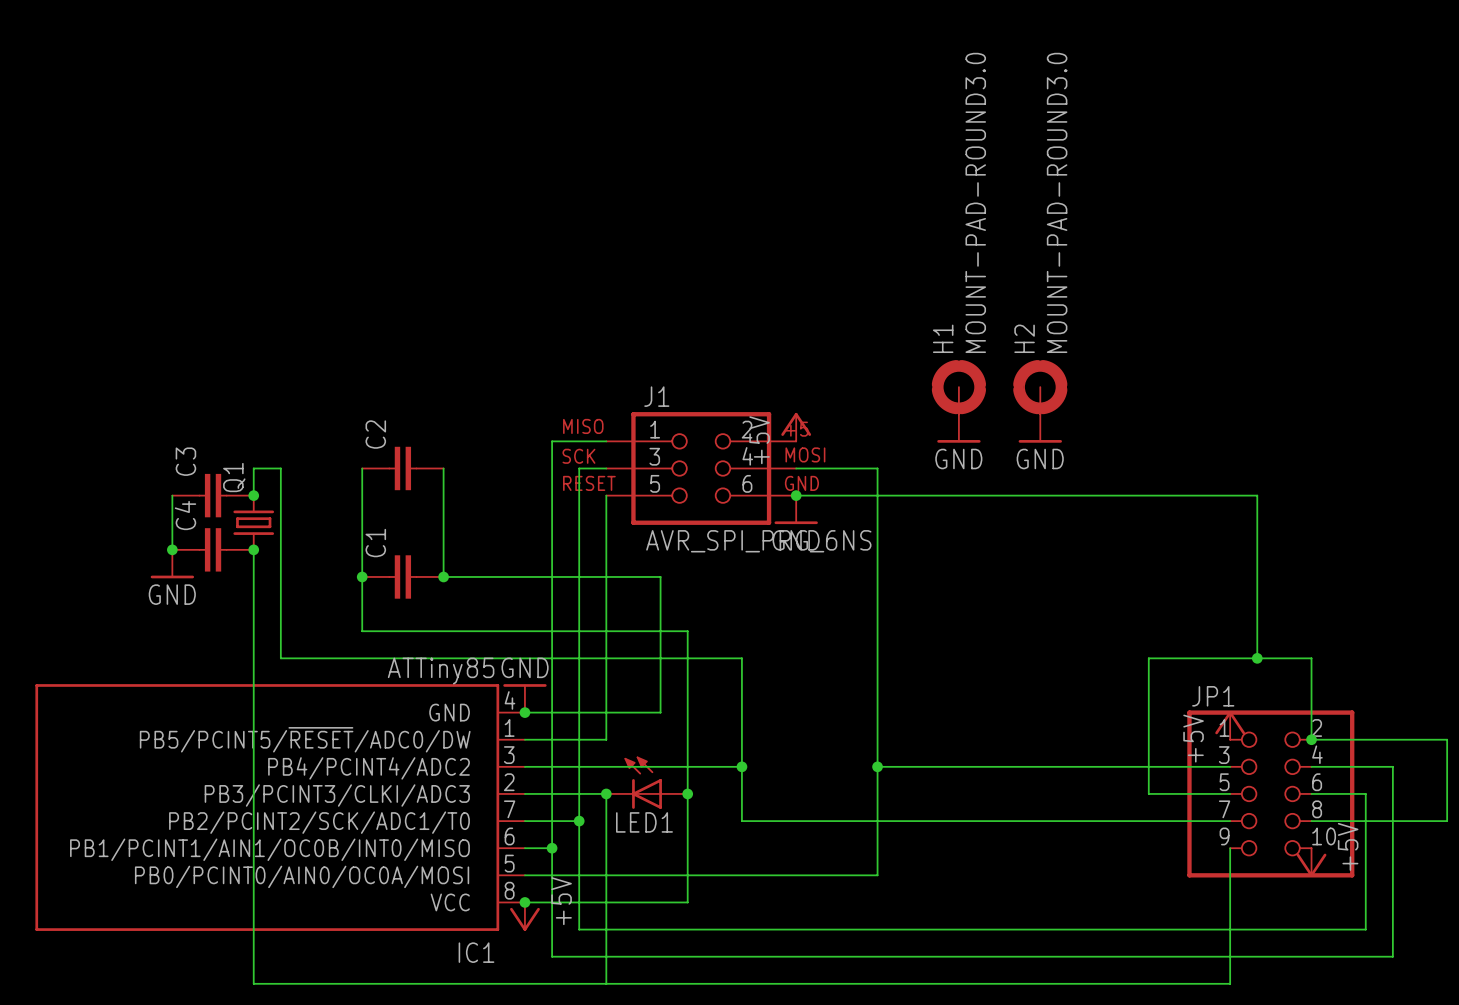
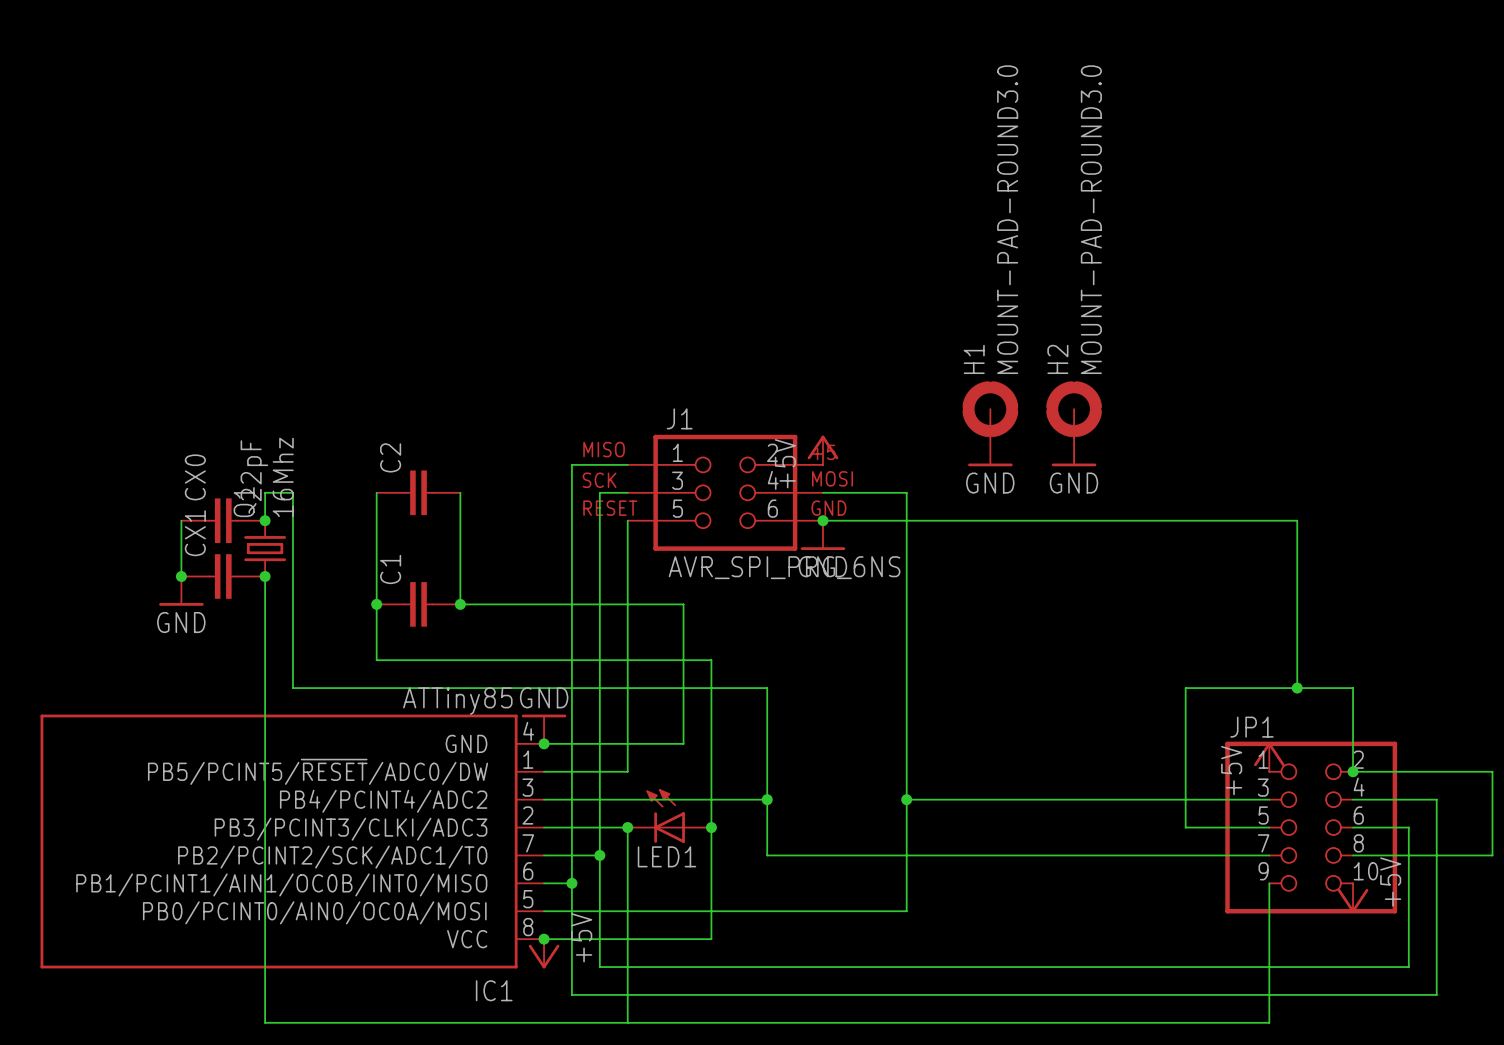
C3 value: none -> 22pF (254, 470)
Q1 value: none -> 16Mhz (283, 477)
C3 name: C3 (185, 461) -> CX0 (195, 477)
C4 name: C4 (185, 515) -> CX1 (195, 533)

